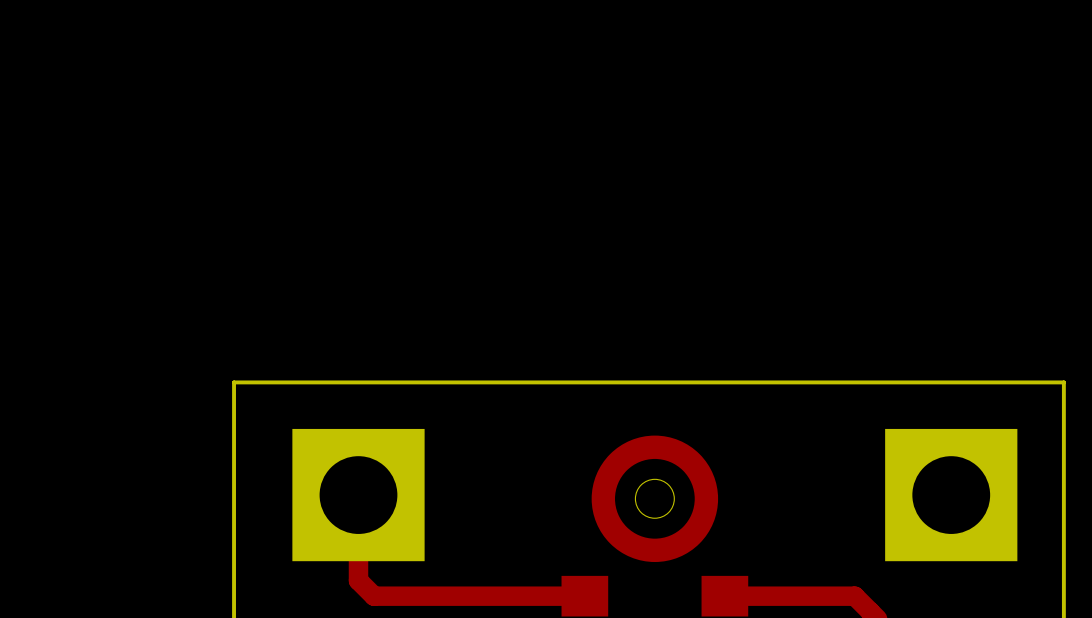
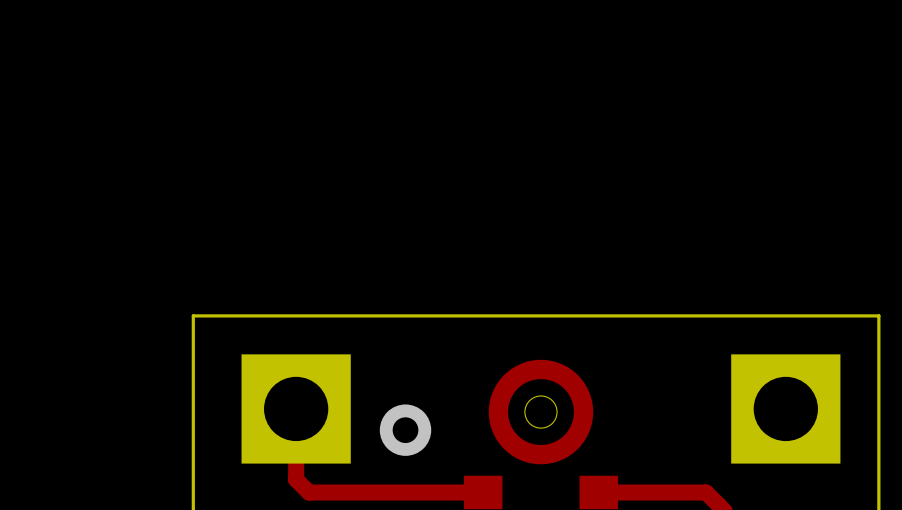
via: none -> (405, 430)

